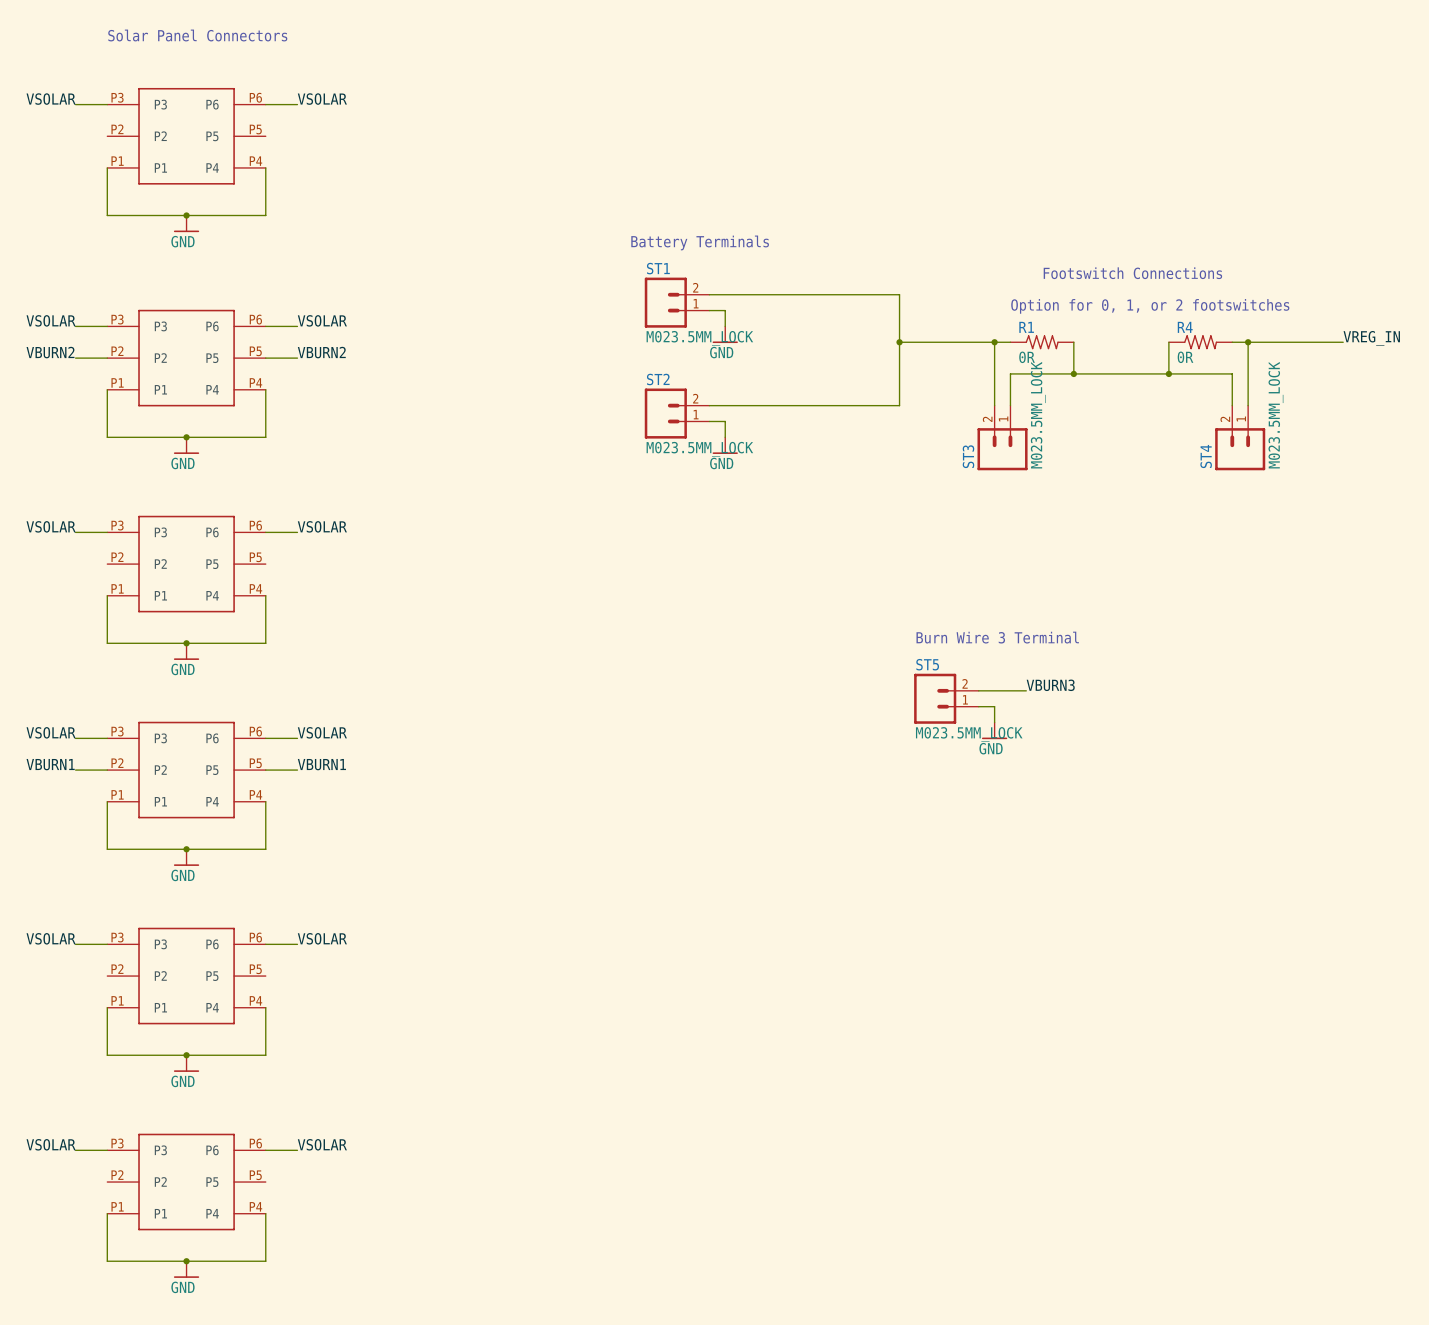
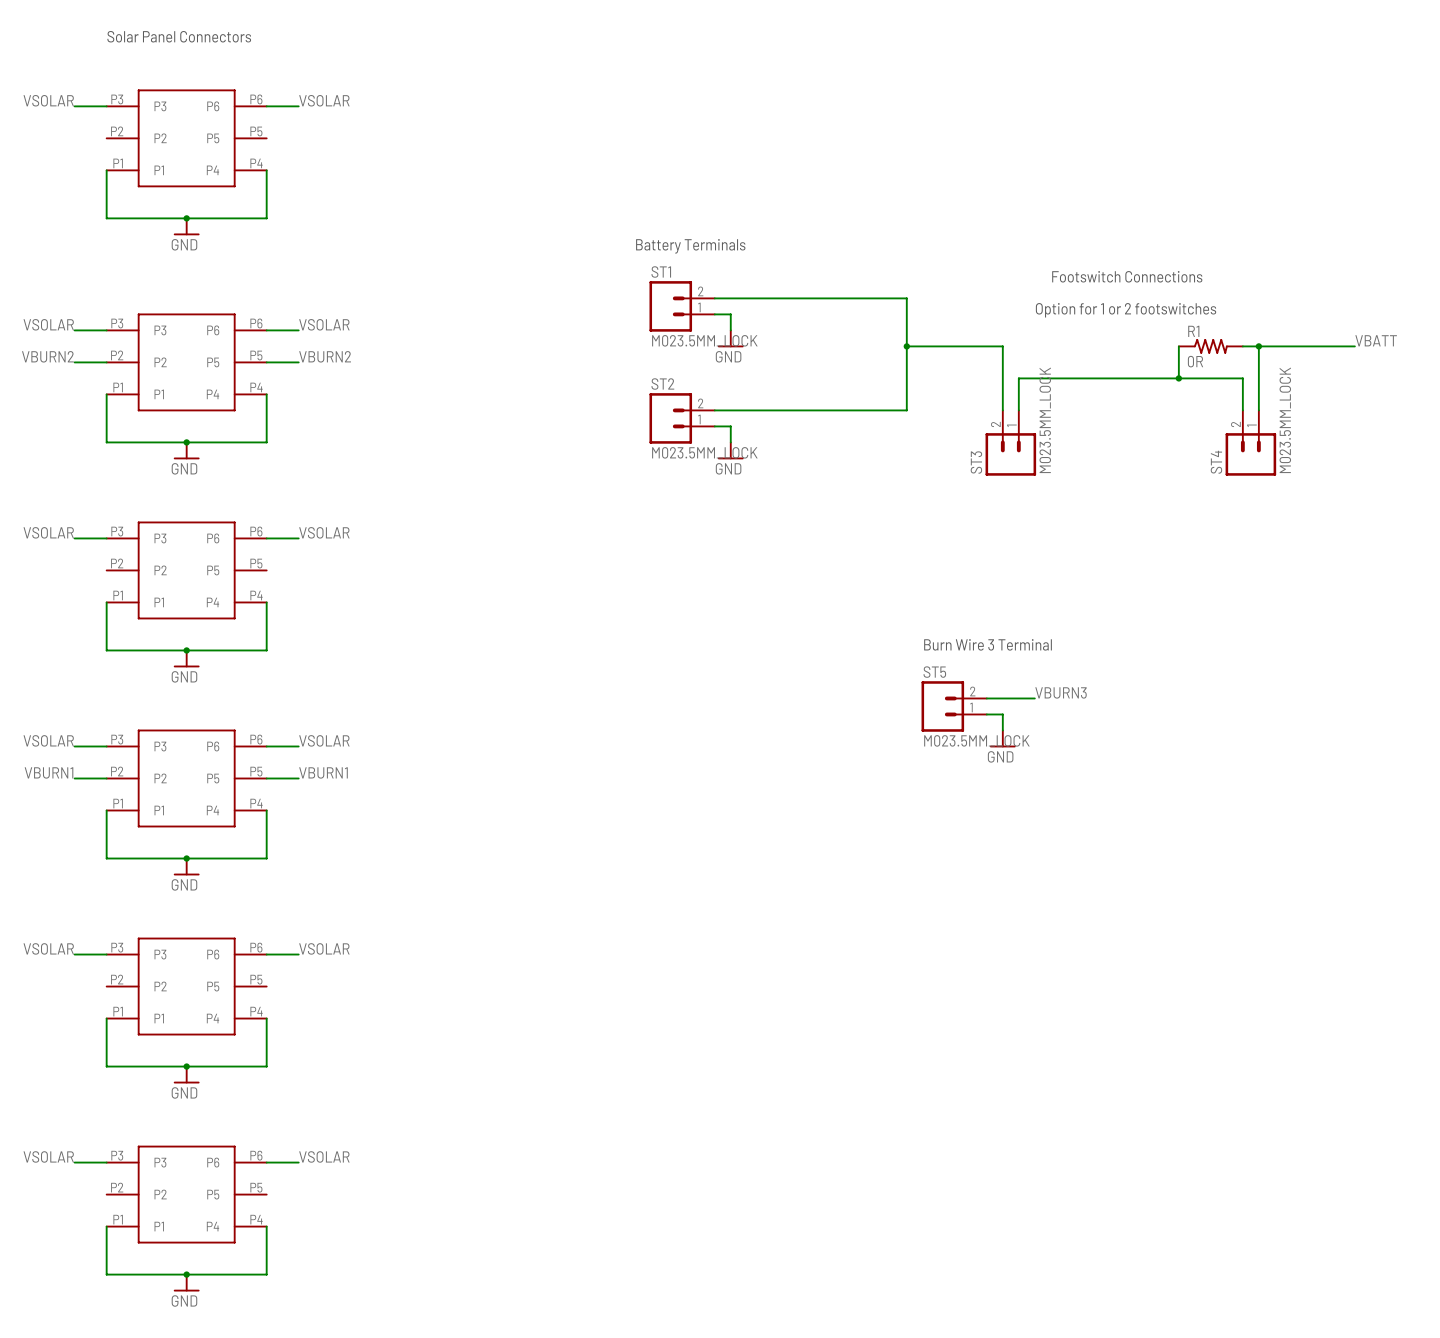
text: Option for 0, 1, or 2 footswitches (1150, 306) -> Option for 1 or 2 footswitches (1126, 310)
R4 name: R4 (1185, 327) -> R1 (1193, 331)
label: VREG_IN (1371, 338) -> VBATT (1376, 340)
wire: (994, 342) (1010, 342) -> none
junction: (994, 342) -> none
R1: 0R (1042, 342) -> none
wire: (1073, 342) (1073, 373) -> none
junction: (1073, 373) -> none

